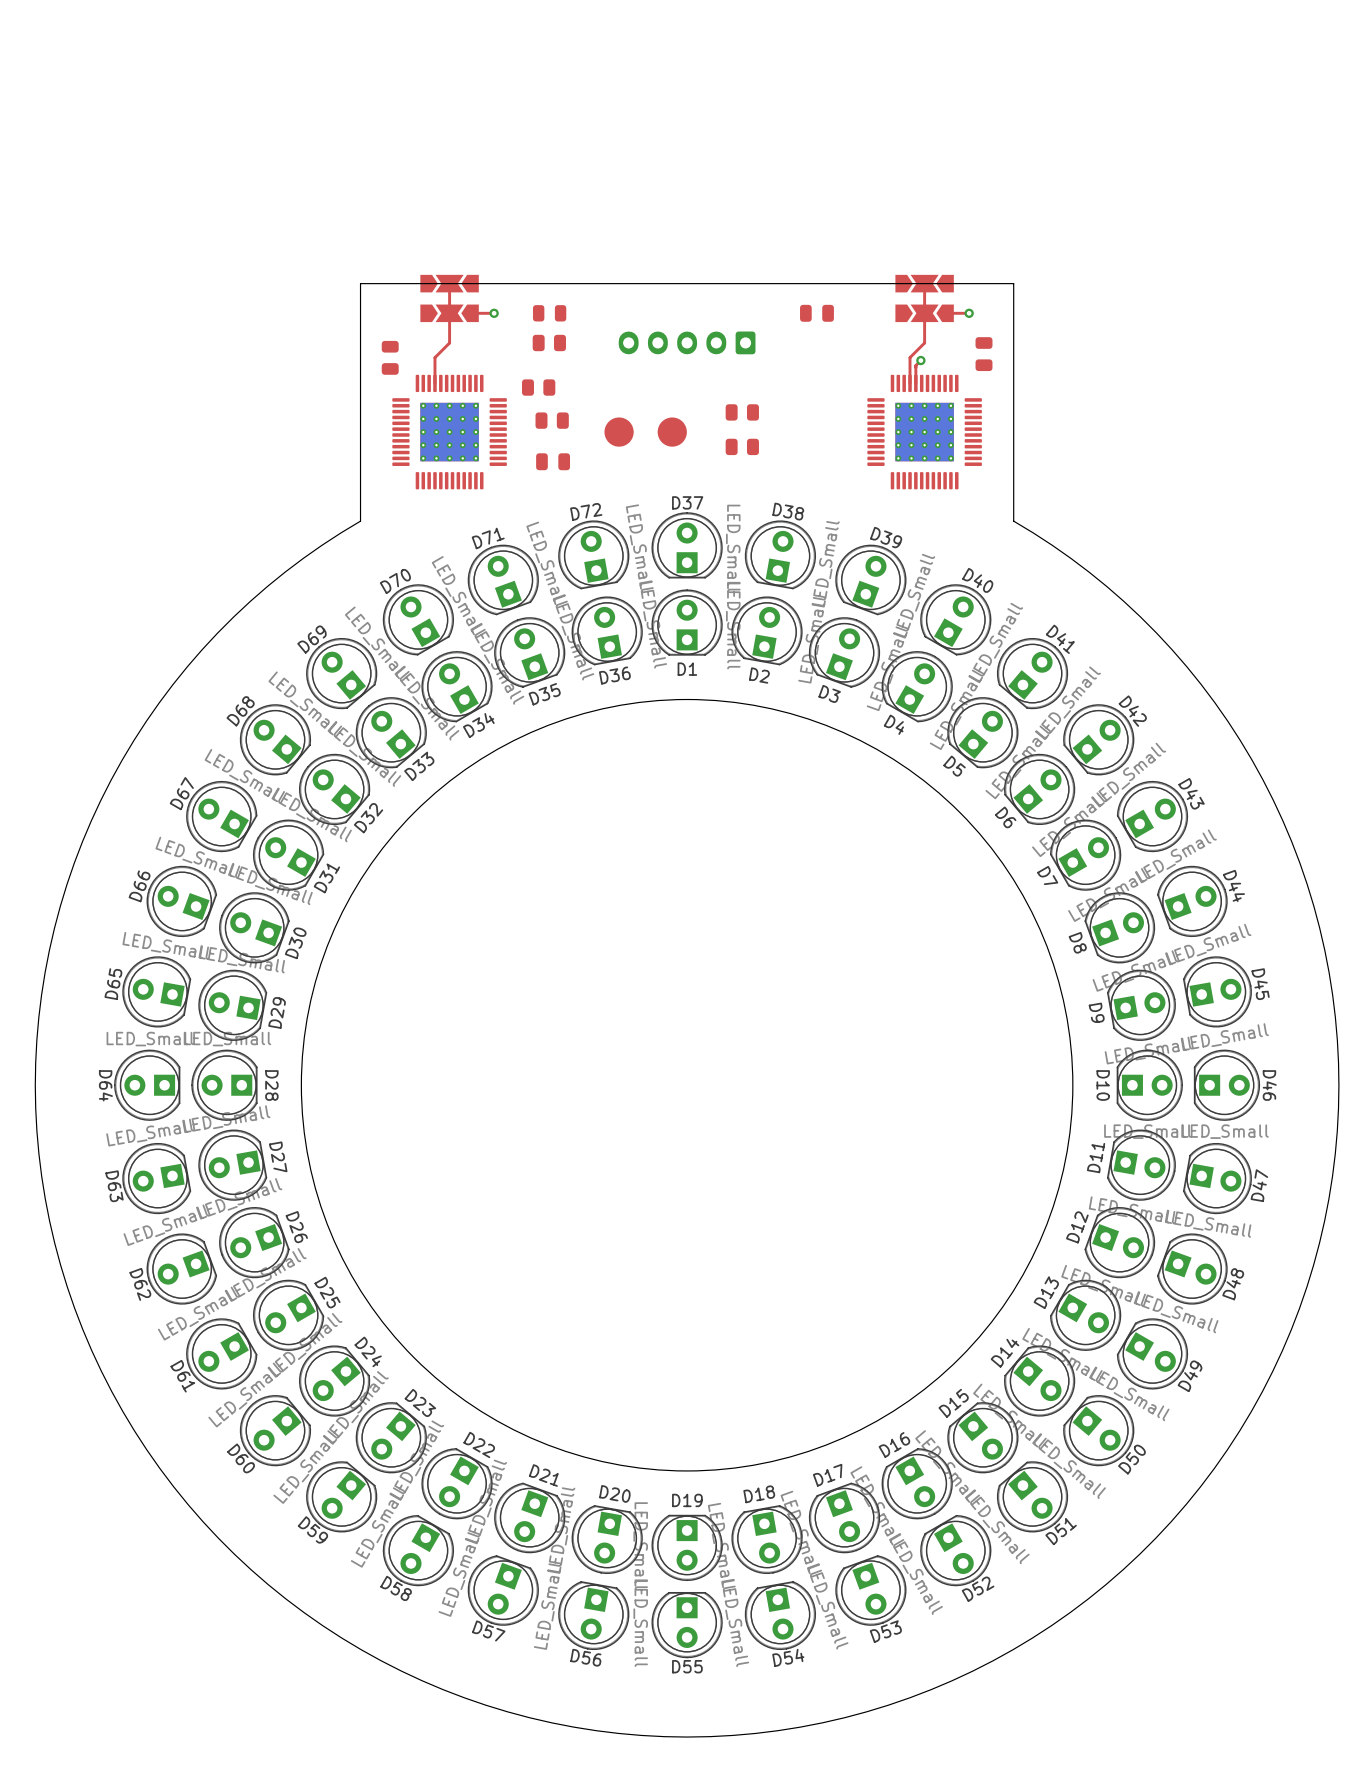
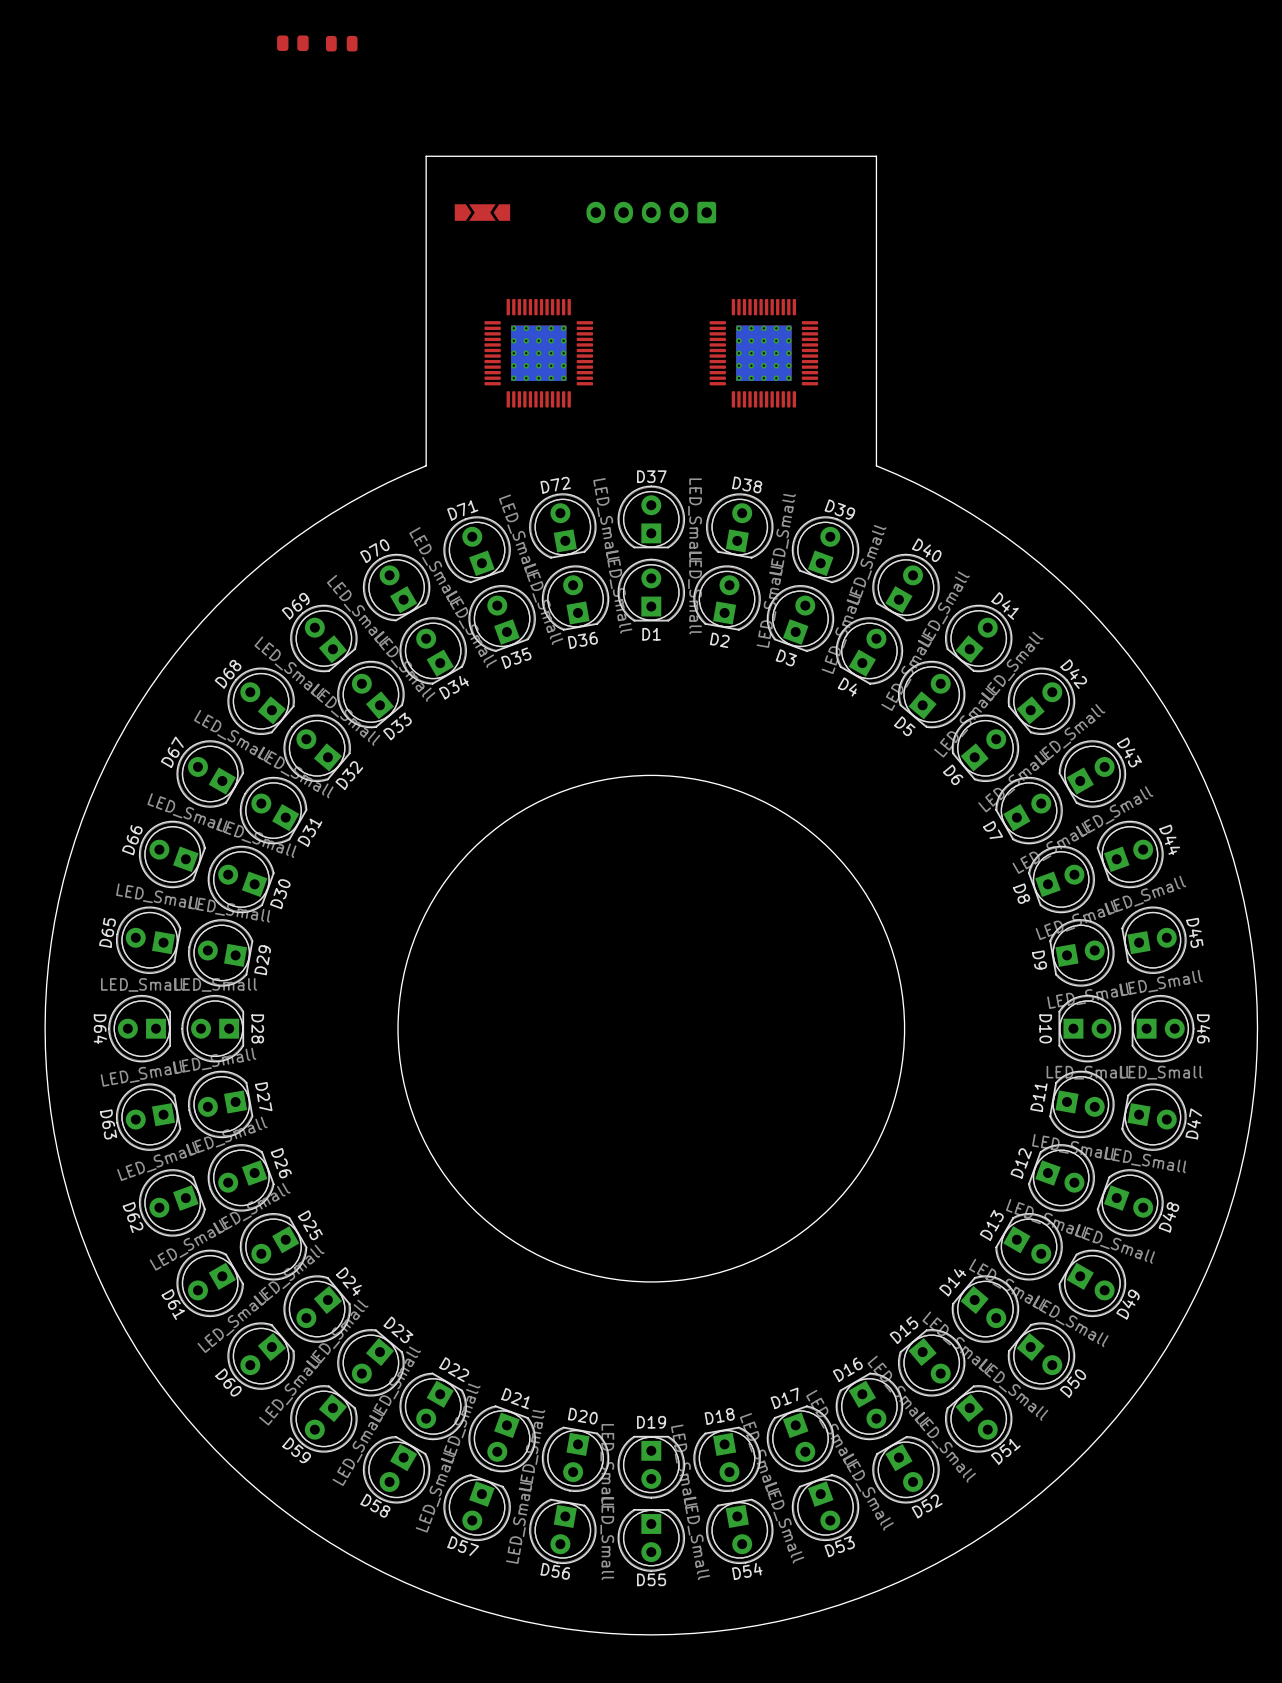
part: none -> (292, 43)
part: none -> (341, 43)
part: none -> (482, 212)
top track: (449, 283) (449, 343) (434, 357) (434, 383) -> none
part: (449, 283) -> none
top track: (924, 283) (924, 343) (910, 357) (910, 383) -> none
part: (924, 283) -> none
board edge: (1013, 283) (1013, 521) (1070, 558) (1123, 601) (1171, 649) (1214, 702) (1251, 759) (1273, 800) (1299, 862) (1319, 928) (1329, 972) (1335, 1017) (1338, 1085) (1337, 1131) (1328, 1198) (1319, 1243) (1306, 1287) (1291, 1329) (1262, 1391) (1227, 1449) (1200, 1486) (1155, 1538) (1105, 1584) (1070, 1612) (1012, 1649) (952, 1680) (888, 1705) (822, 1722) (755, 1733) (687, 1737) (641, 1735) (573, 1727) (507, 1711) (443, 1689) (381, 1660) (322, 1625) (268, 1584) (234, 1554) (187, 1504) (159, 1468) (122, 1411) (91, 1350) (67, 1287) (49, 1221) (41, 1176) (35, 1108) (36, 1040) (45, 972) (60, 906) (82, 841) (100, 800) (122, 759) (146, 721) (187, 666) (217, 632) (267, 586) (321, 545) (360, 521) (360, 283) (1013, 283) -> (876, 156) (876, 465) (915, 482) (970, 513) (1006, 537) (1055, 576) (1100, 621) (1140, 671) (1164, 706) (1195, 761) (1220, 819) (1233, 860) (1248, 922) (1254, 964) (1257, 1027) (1256, 1069) (1248, 1132) (1239, 1174) (1228, 1215) (1205, 1274) (1176, 1331) (1142, 1384) (1102, 1433) (1057, 1478) (1008, 1518) (954, 1553) (898, 1582) (838, 1605) (798, 1616) (735, 1628) (693, 1633) (630, 1634) (566, 1628) (504, 1616) (443, 1598) (385, 1573) (347, 1553) (294, 1518) (245, 1478) (200, 1433) (160, 1384) (136, 1349) (115, 1312) (88, 1254) (68, 1194) (54, 1132) (46, 1069) (45, 1006) (51, 943) (63, 880) (82, 819) (116, 742) (149, 688) (188, 637) (247, 576) (296, 537) (349, 502) (426, 465) (426, 156) (876, 156)
part: (449, 313) -> none
top track: (494, 313) (472, 313) -> none
via: (494, 313) -> none
part: (549, 313) -> none
part: (816, 313) -> none
part: (924, 313) -> none
top track: (969, 313) (948, 313) -> none
via: (969, 313) -> none
part position: (687, 342) -> (651, 212)
part: (549, 343) -> none
part: (984, 354) -> none
part: (390, 357) -> none
top track: (920, 360) (915, 365) (915, 383) -> none
via: (920, 360) -> none
part: (538, 387) -> none
part: (742, 412) -> none
part: (552, 420) -> none
part position: (449, 432) -> (538, 353)
part: (619, 432) -> none
part: (672, 432) -> none
part position: (924, 432) -> (763, 353)
part: (742, 446) -> none
part: (553, 461) -> none
round board edge size: [300, 698, 1074, 1472] -> [397, 774, 906, 1283]

